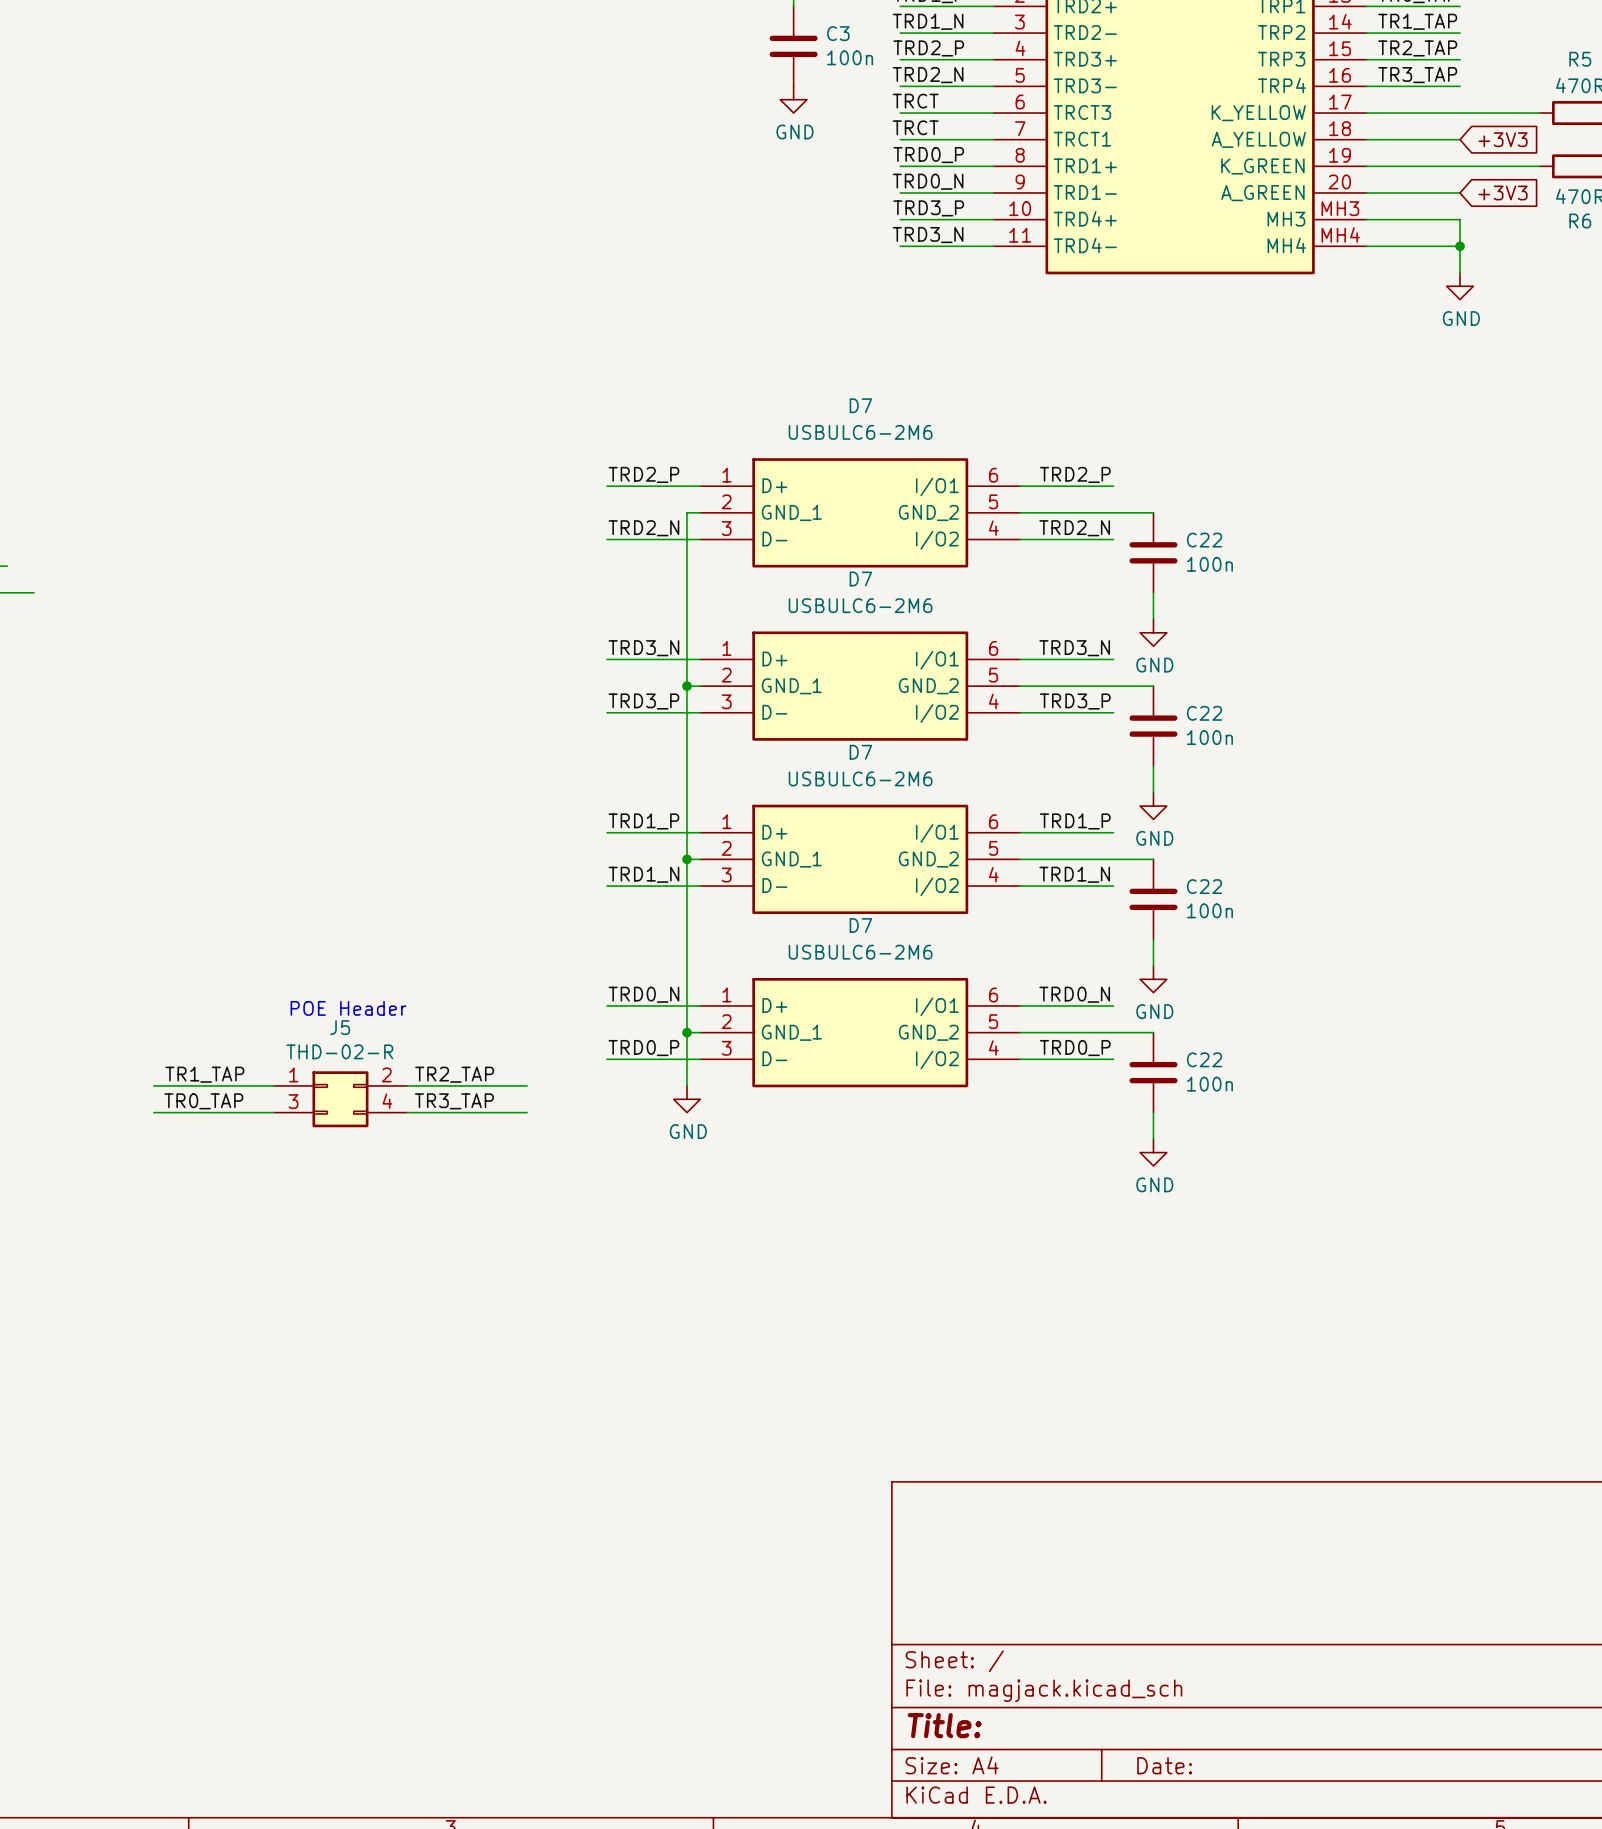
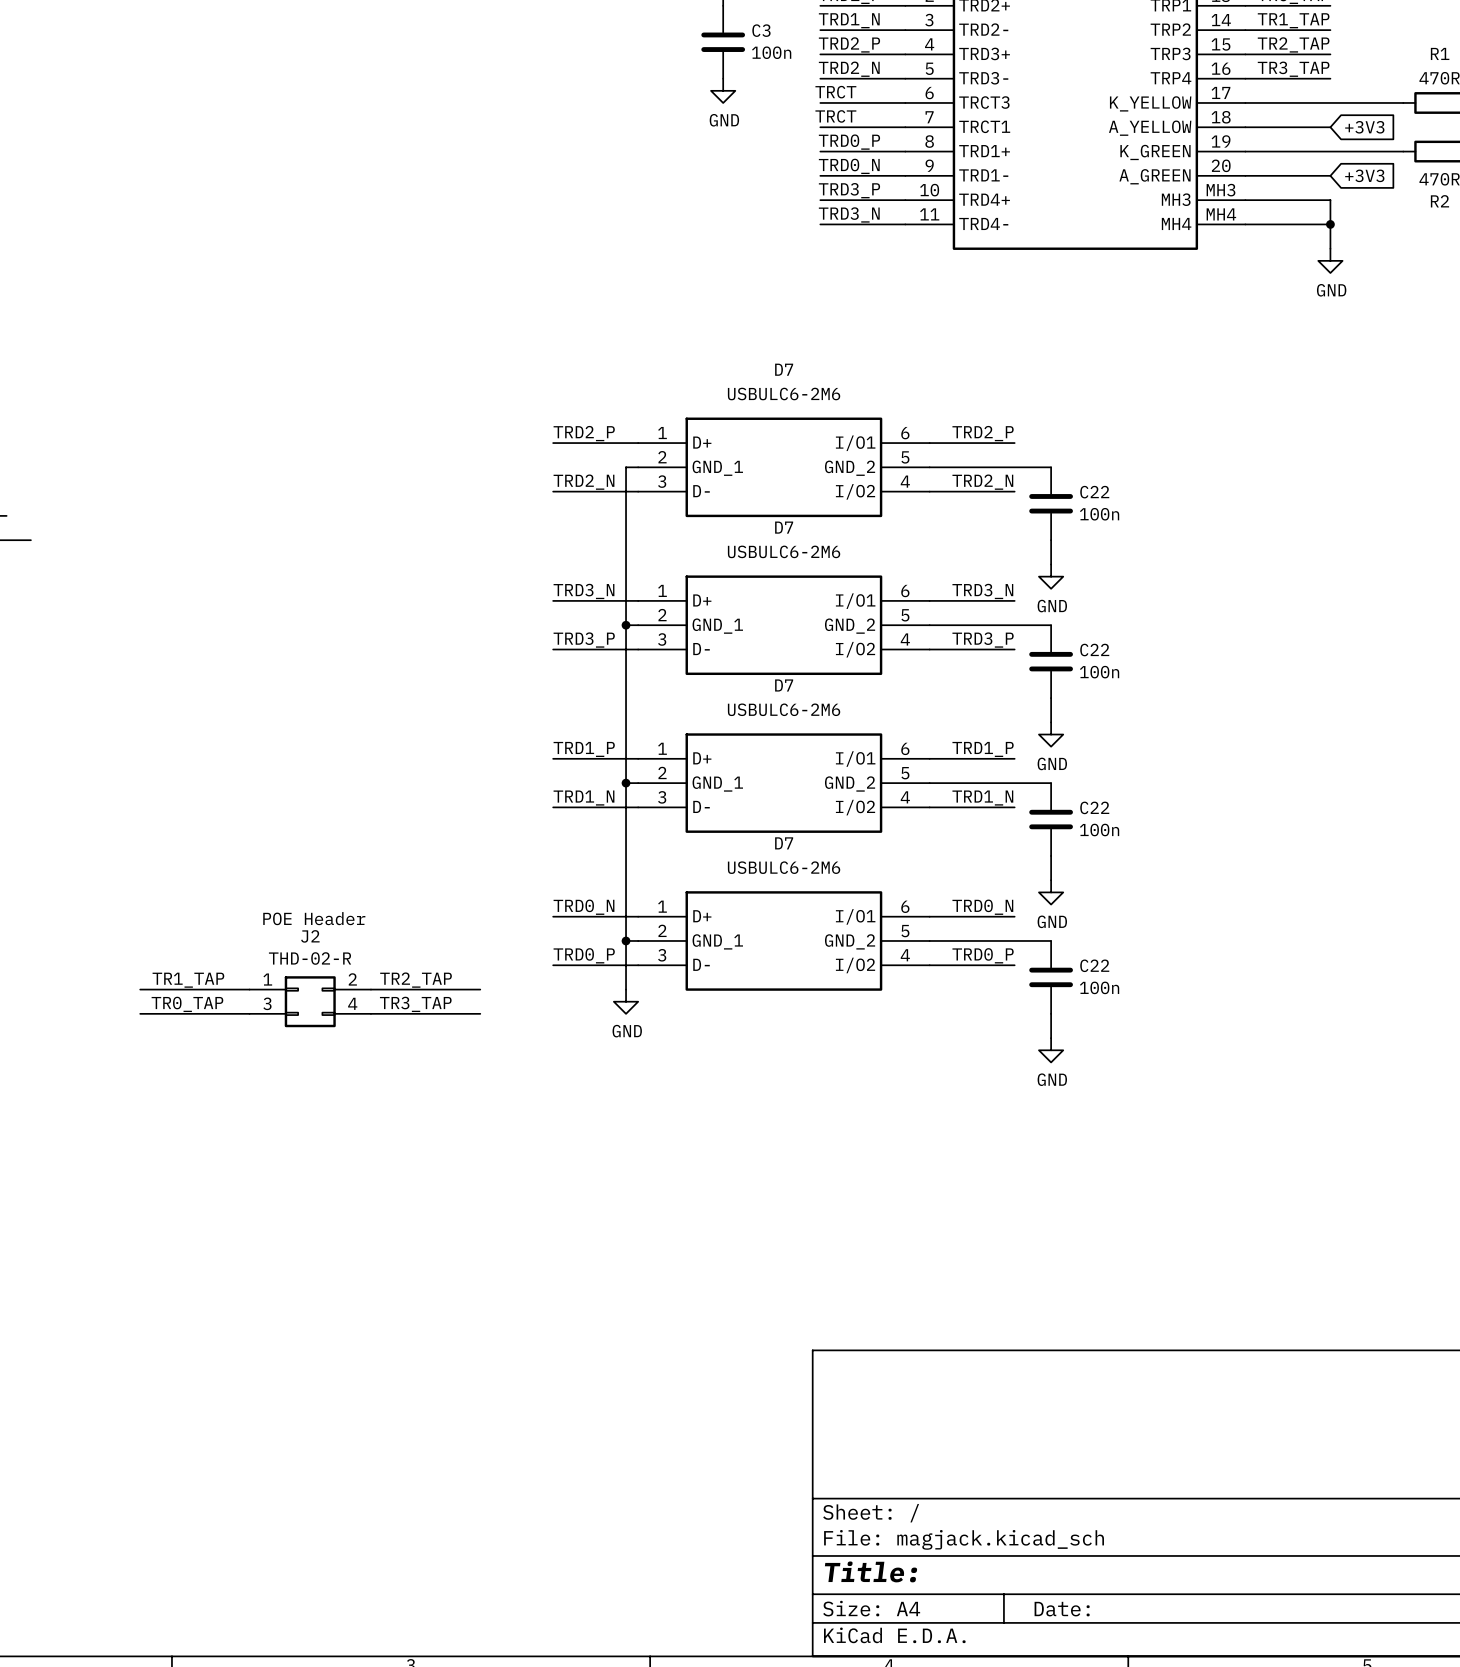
R5 name: R5 (1580, 59) -> R1 (1440, 53)
R6 name: R6 (1580, 221) -> R2 (1439, 201)
J5 name: J5 (340, 1027) -> J2 (310, 936)

